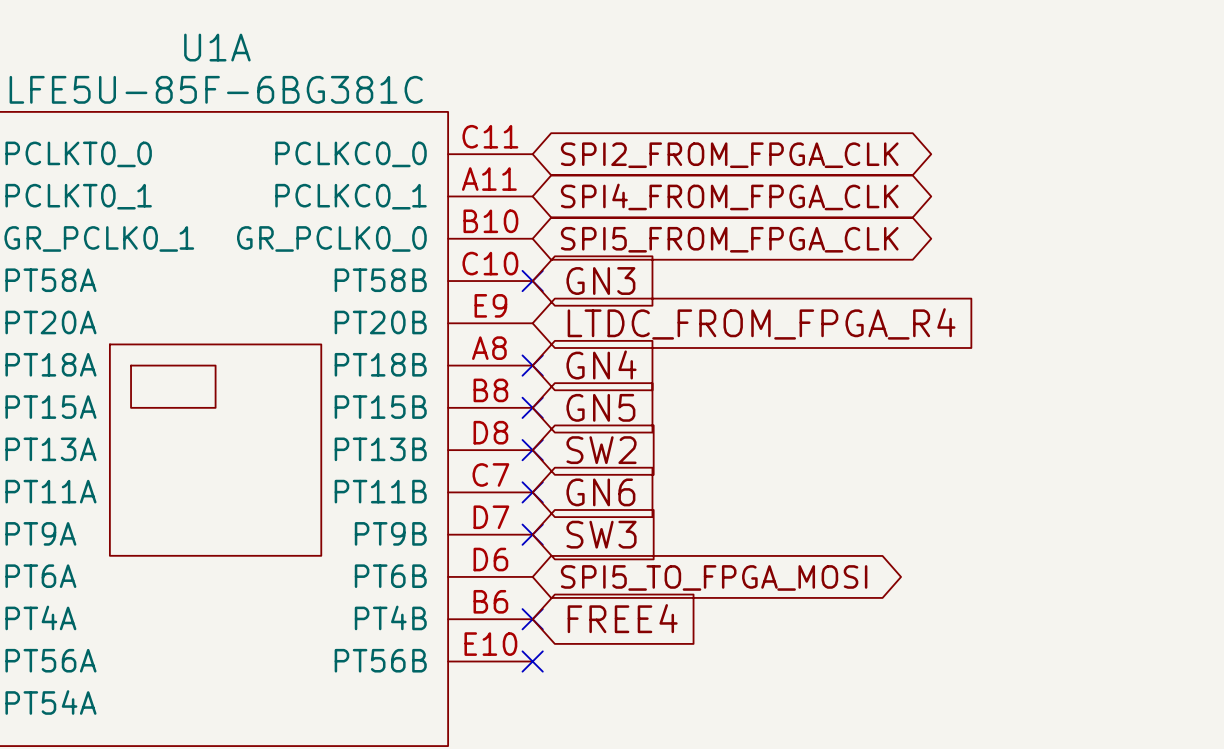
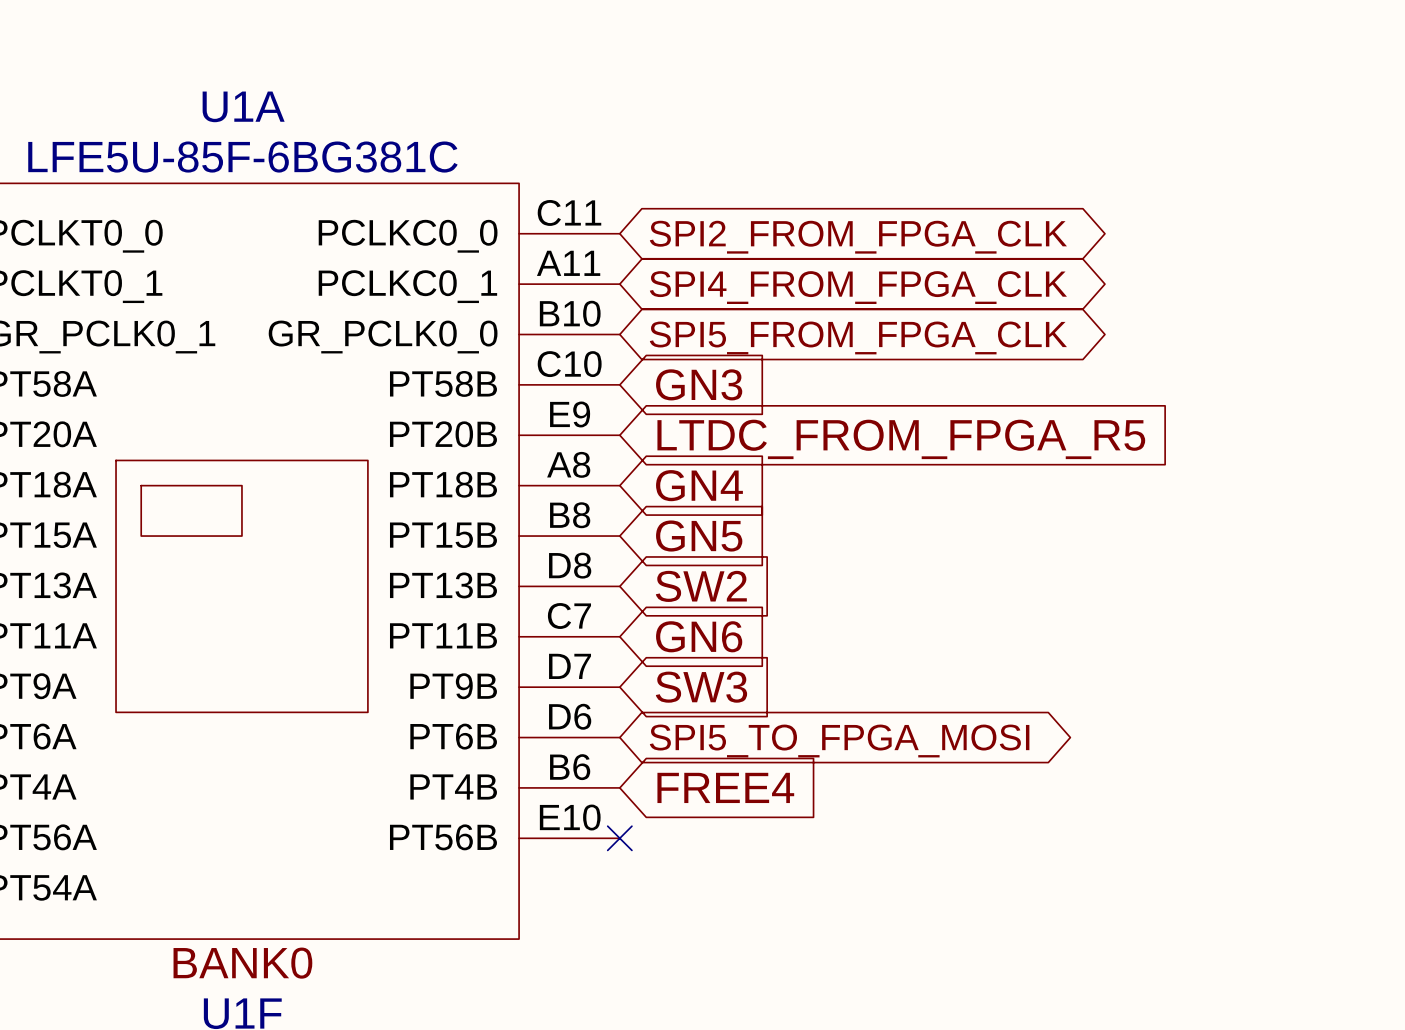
no-connect mark: (532, 281) -> none
global label: LTDC_FROM_FPGA_R4 (761, 323) -> LTDC_FROM_FPGA_R5 (901, 439)
no-connect mark: (532, 365) -> none
no-connect mark: (532, 407) -> none
no-connect mark: (532, 450) -> none
no-connect mark: (532, 492) -> none
no-connect mark: (532, 534) -> none
no-connect mark: (532, 619) -> none

